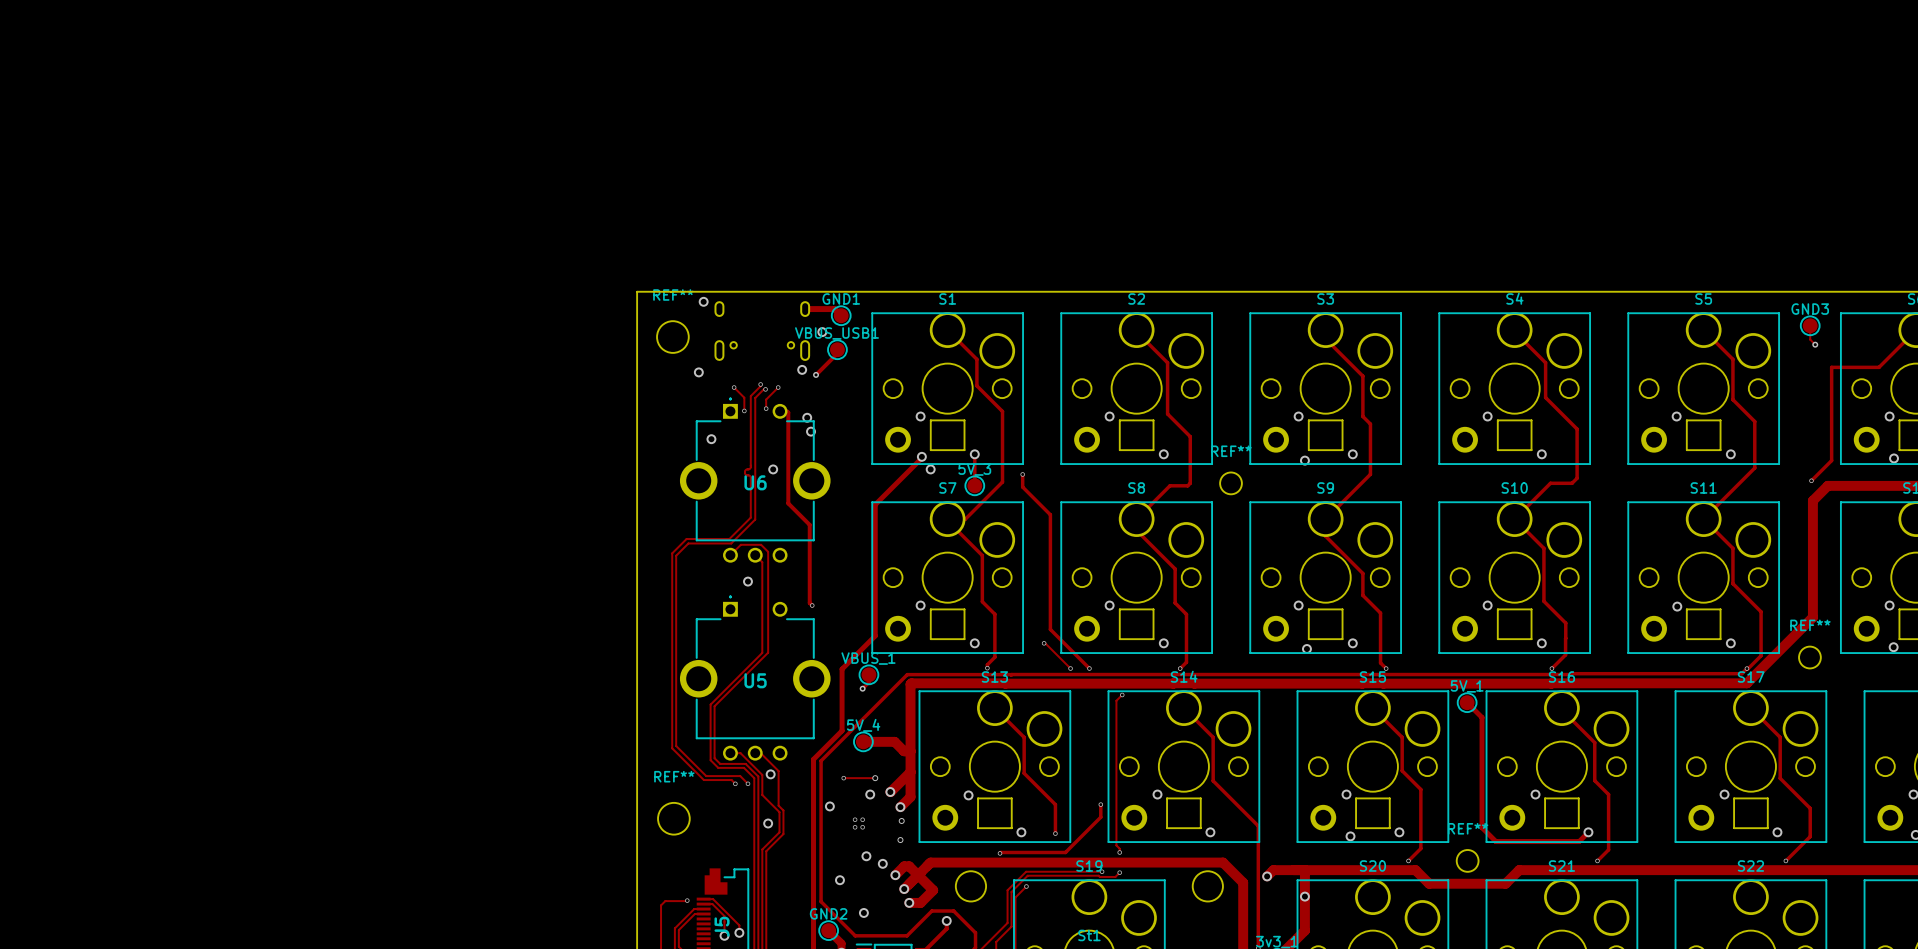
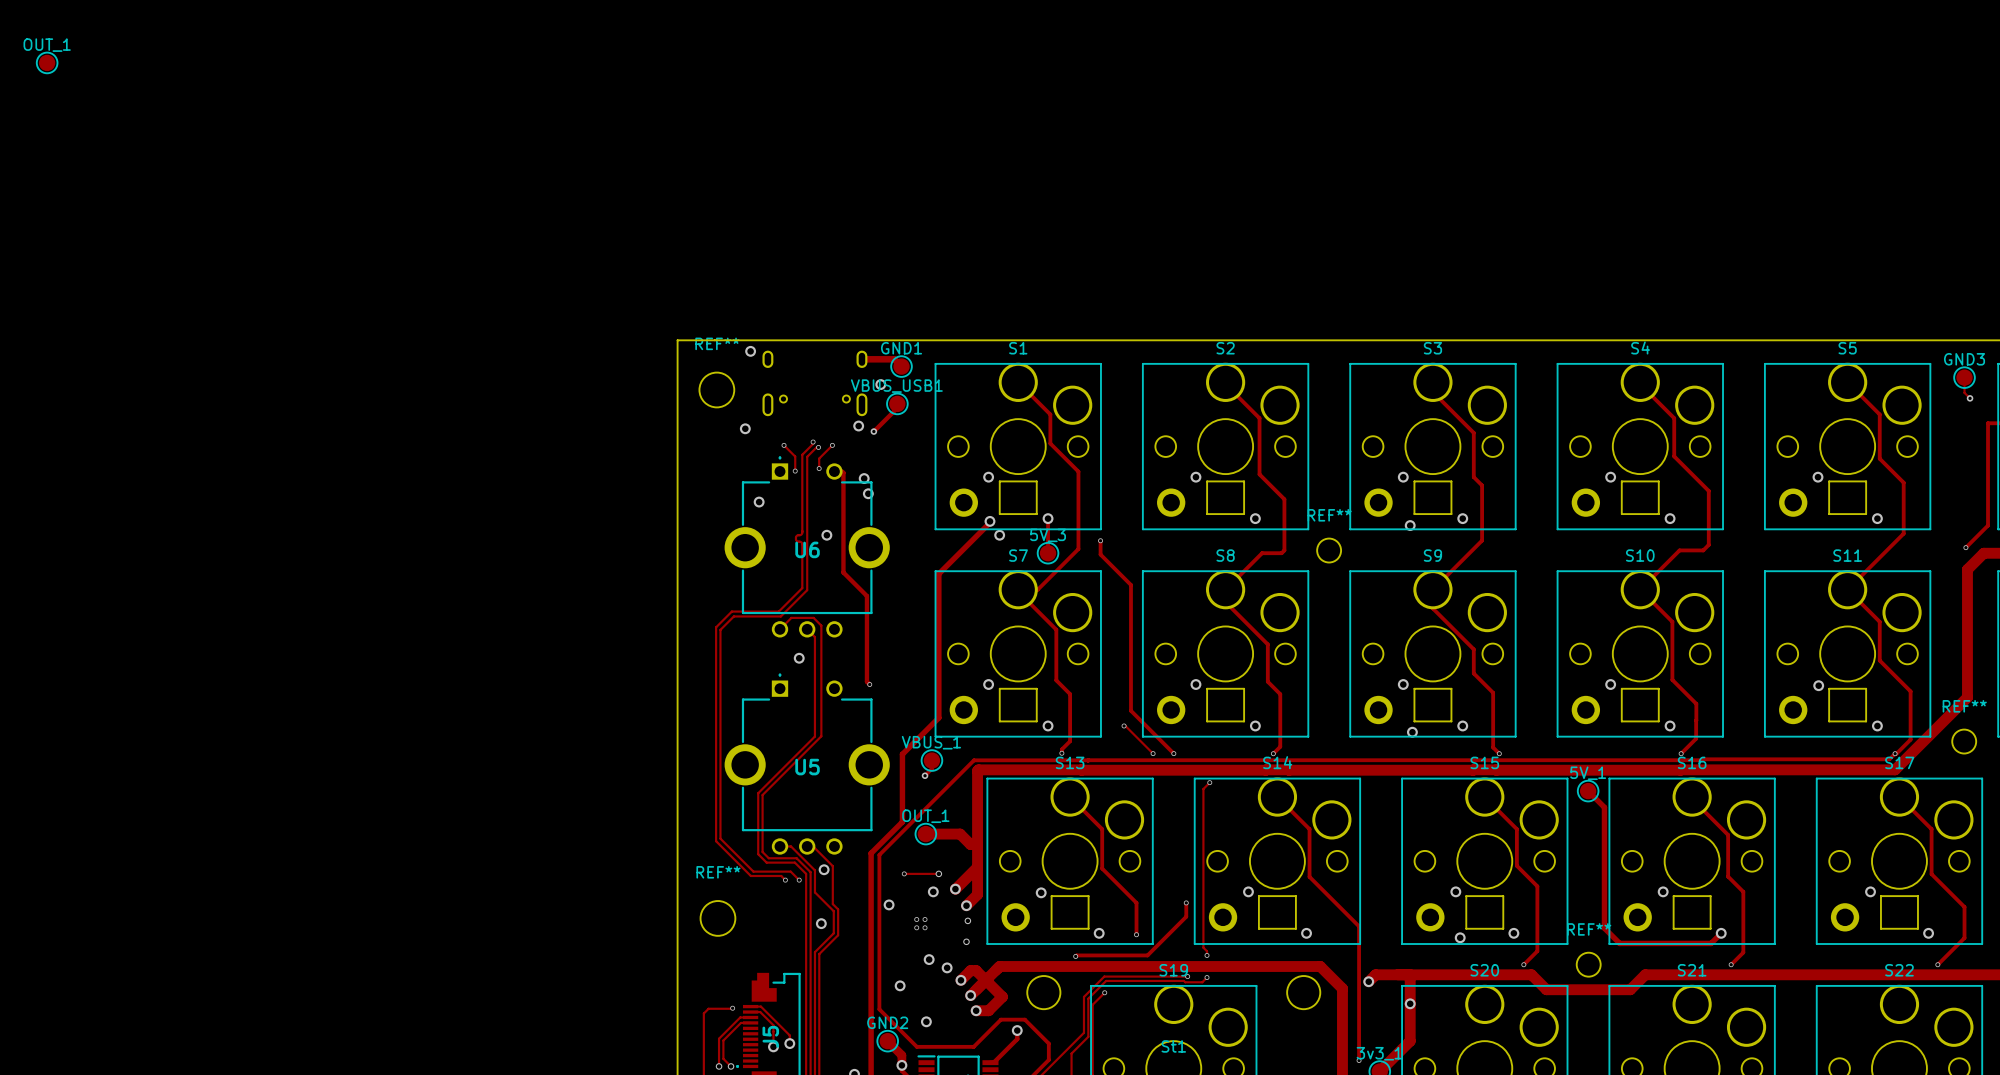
OUT_1: none -> (47, 62)
5V_4 name: 5V_4 (863, 725) -> OUT_1 (925, 816)

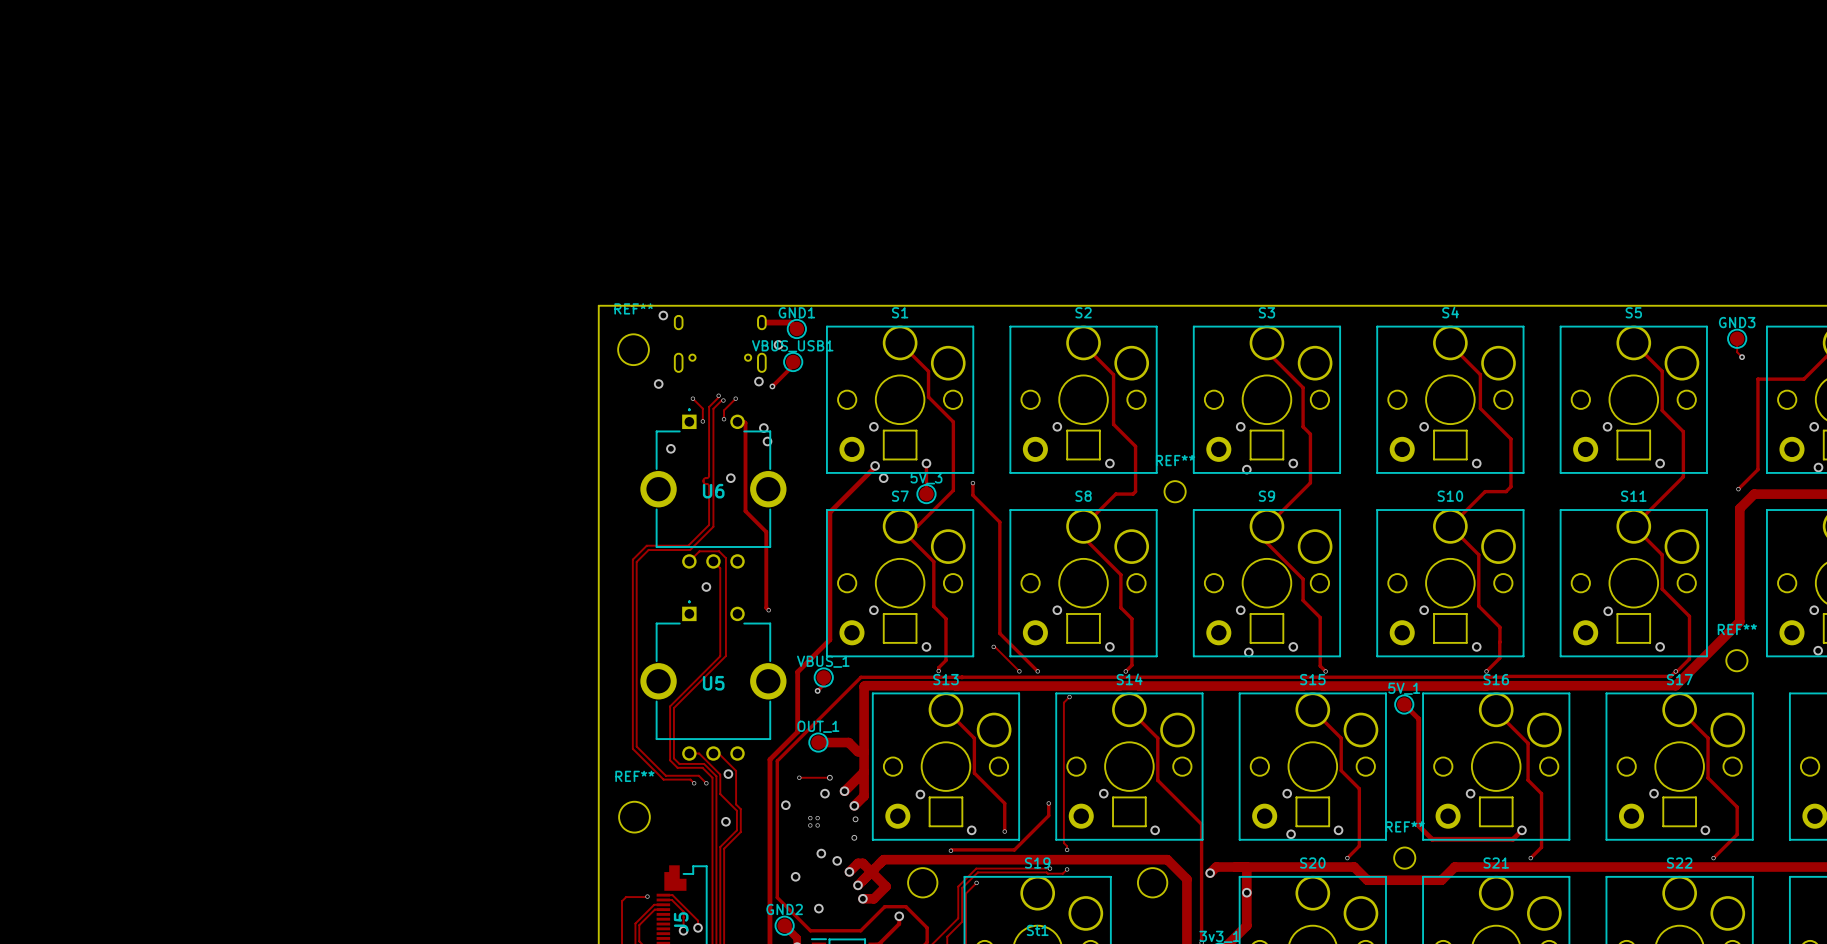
OUT_1: (47, 62) -> none

